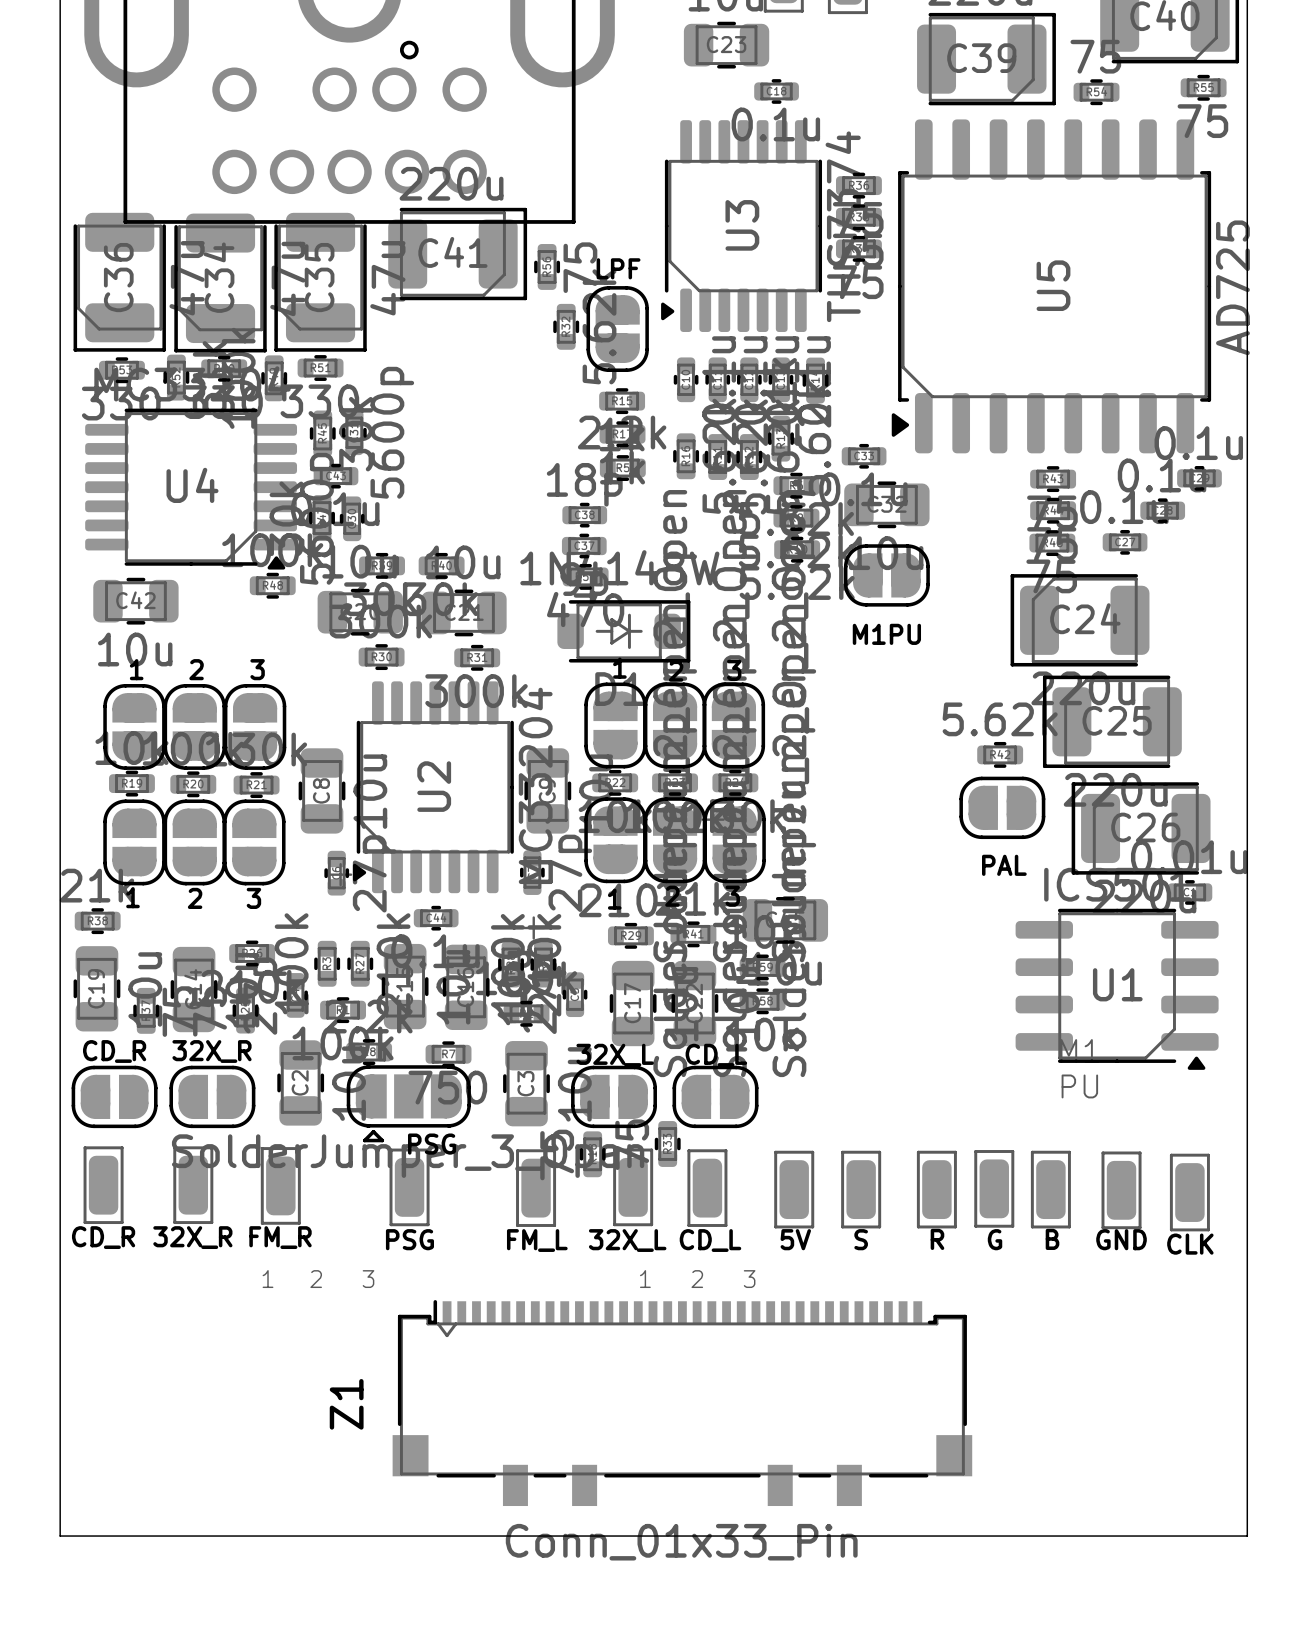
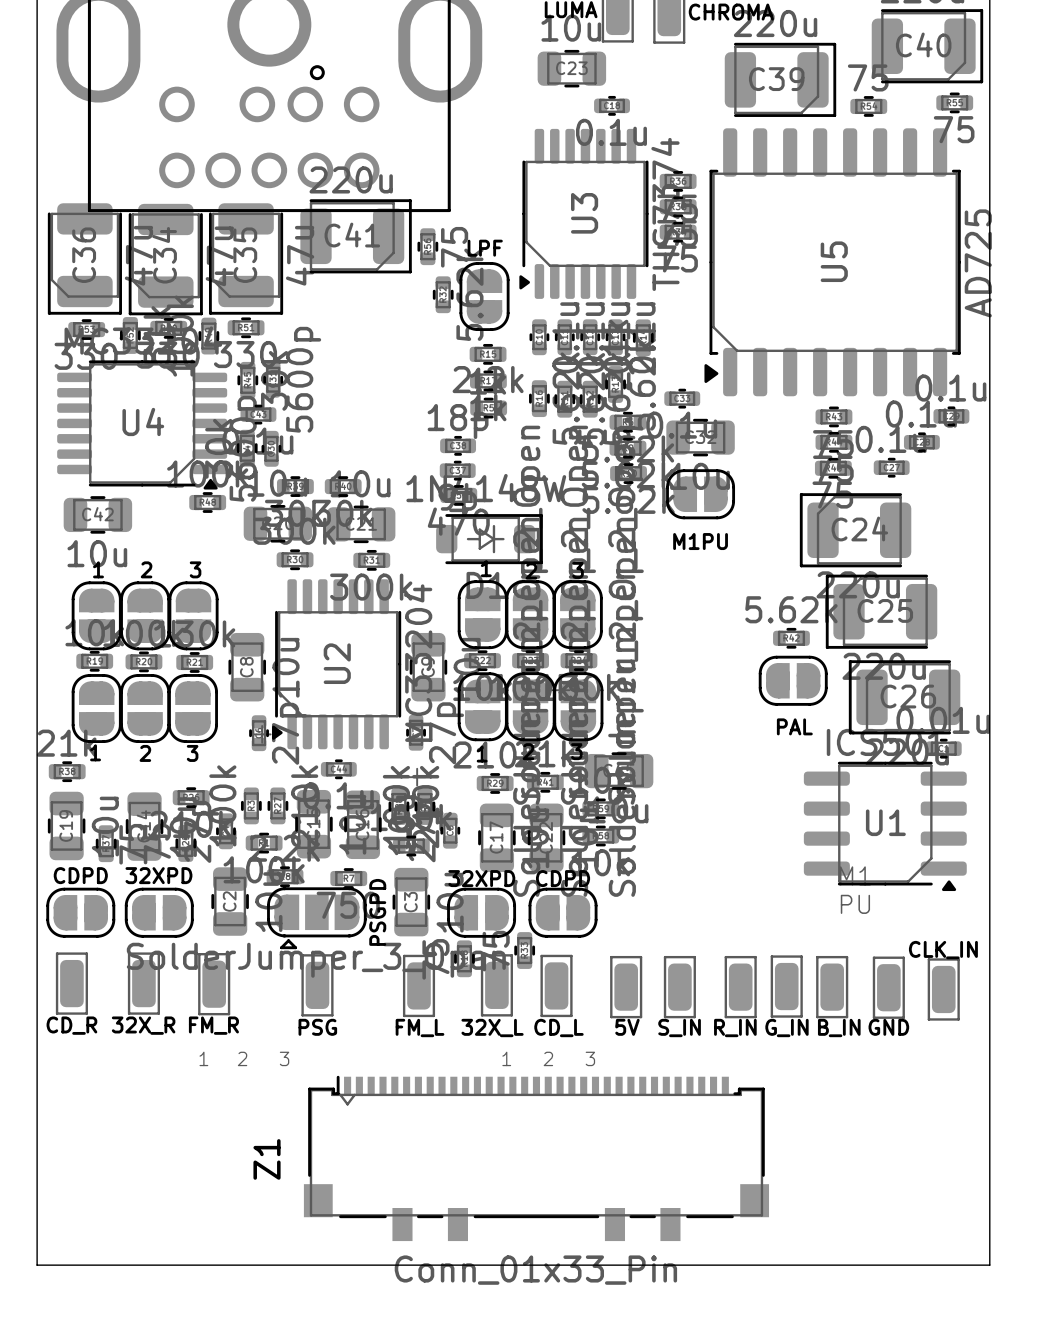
CD_R name: CD_R (114, 1051) -> CDPD (80, 875)
32X_R name: 32X_R (212, 1051) -> 32XPD (158, 875)
32X_L name: 32X_L (615, 1055) -> 32XPD (481, 878)
CD_L name: CD_L (716, 1055) -> CDPD (563, 878)
PSG name: PSG (432, 1144) -> PSGPD (377, 912)
S name: S (861, 1239) -> S_IN (679, 1028)
R name: R (937, 1239) -> R_IN (735, 1028)
G name: G (995, 1239) -> G_IN (786, 1028)
B name: B (1052, 1239) -> B_IN (839, 1028)
CLK name: CLK (1190, 1244) -> CLK_IN (943, 950)

